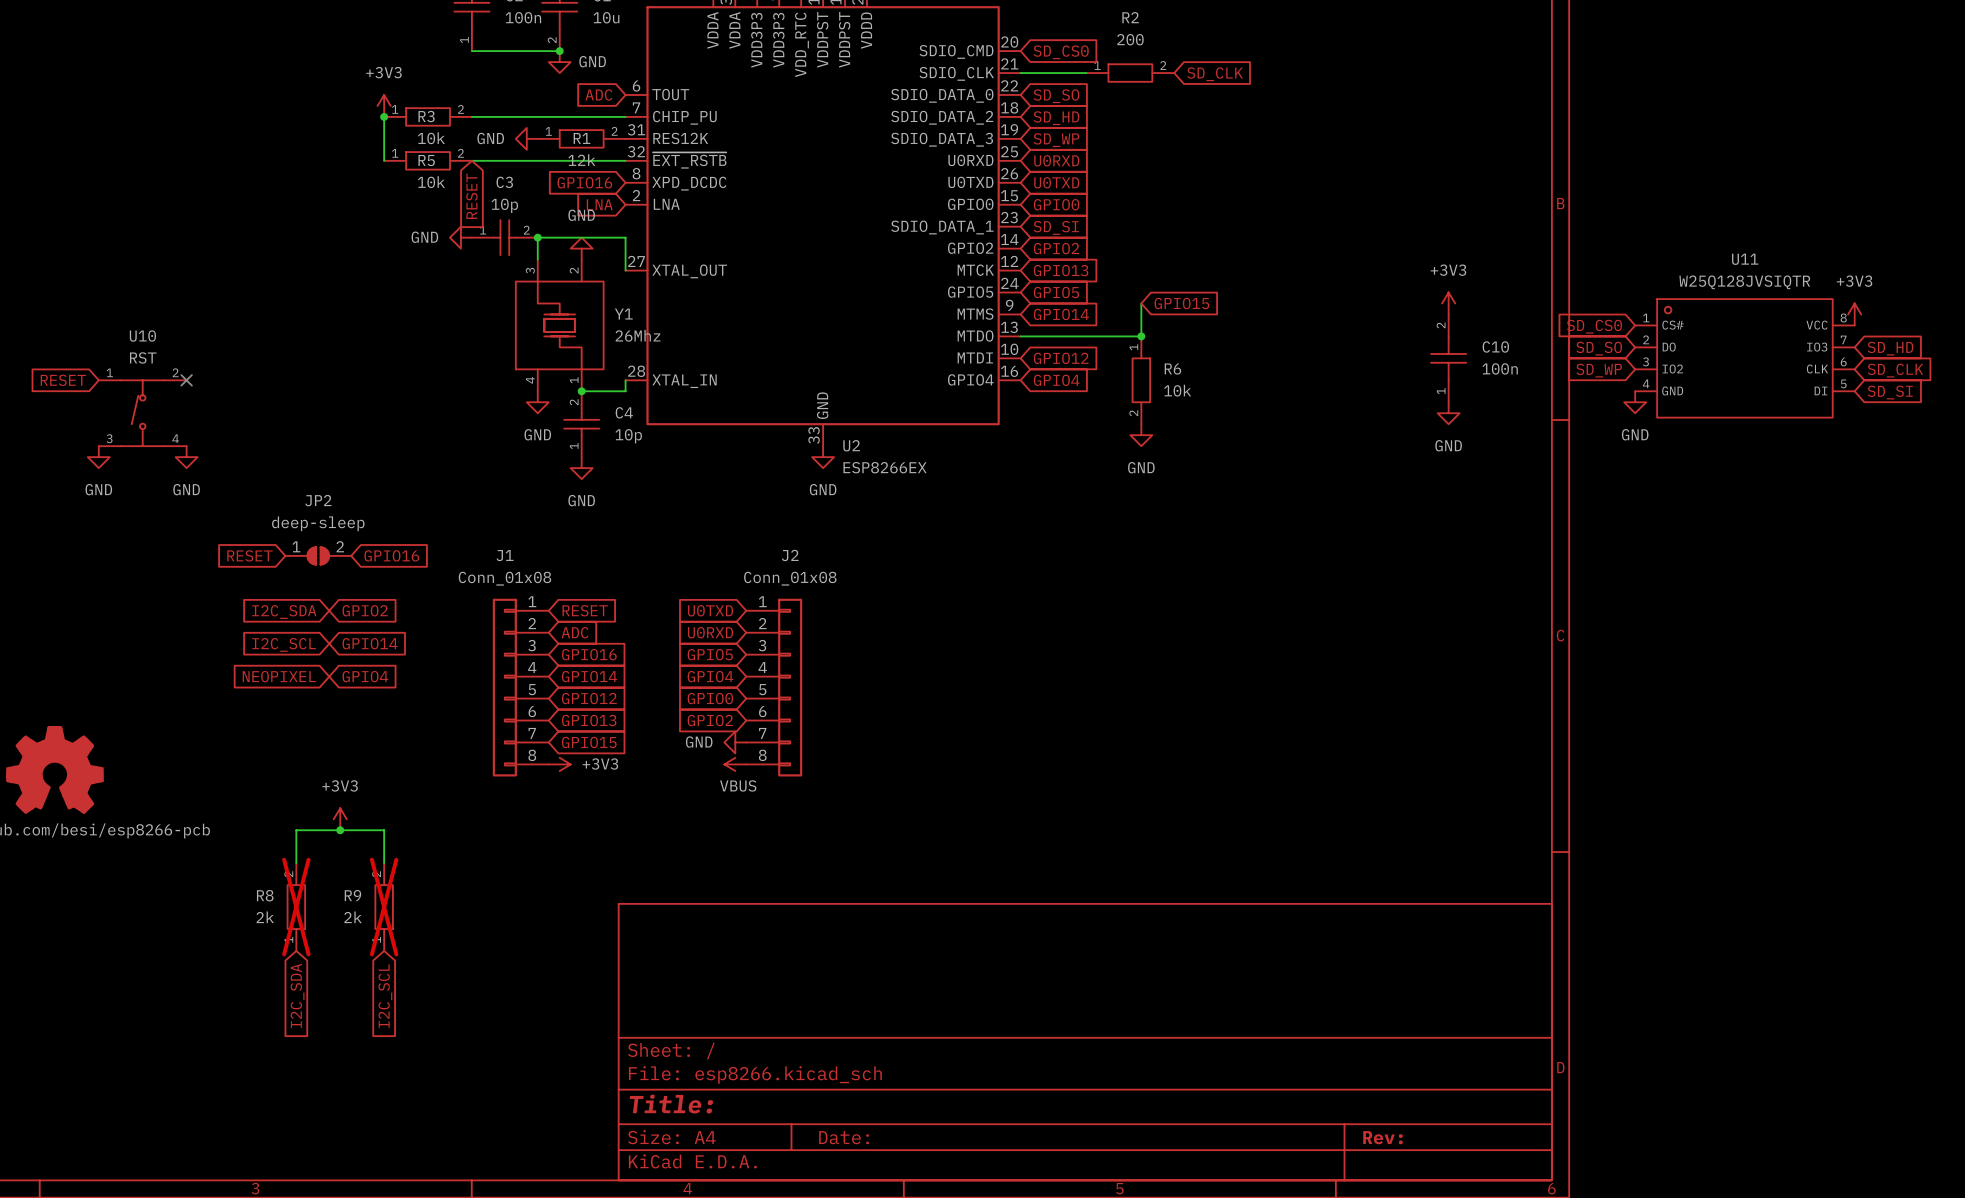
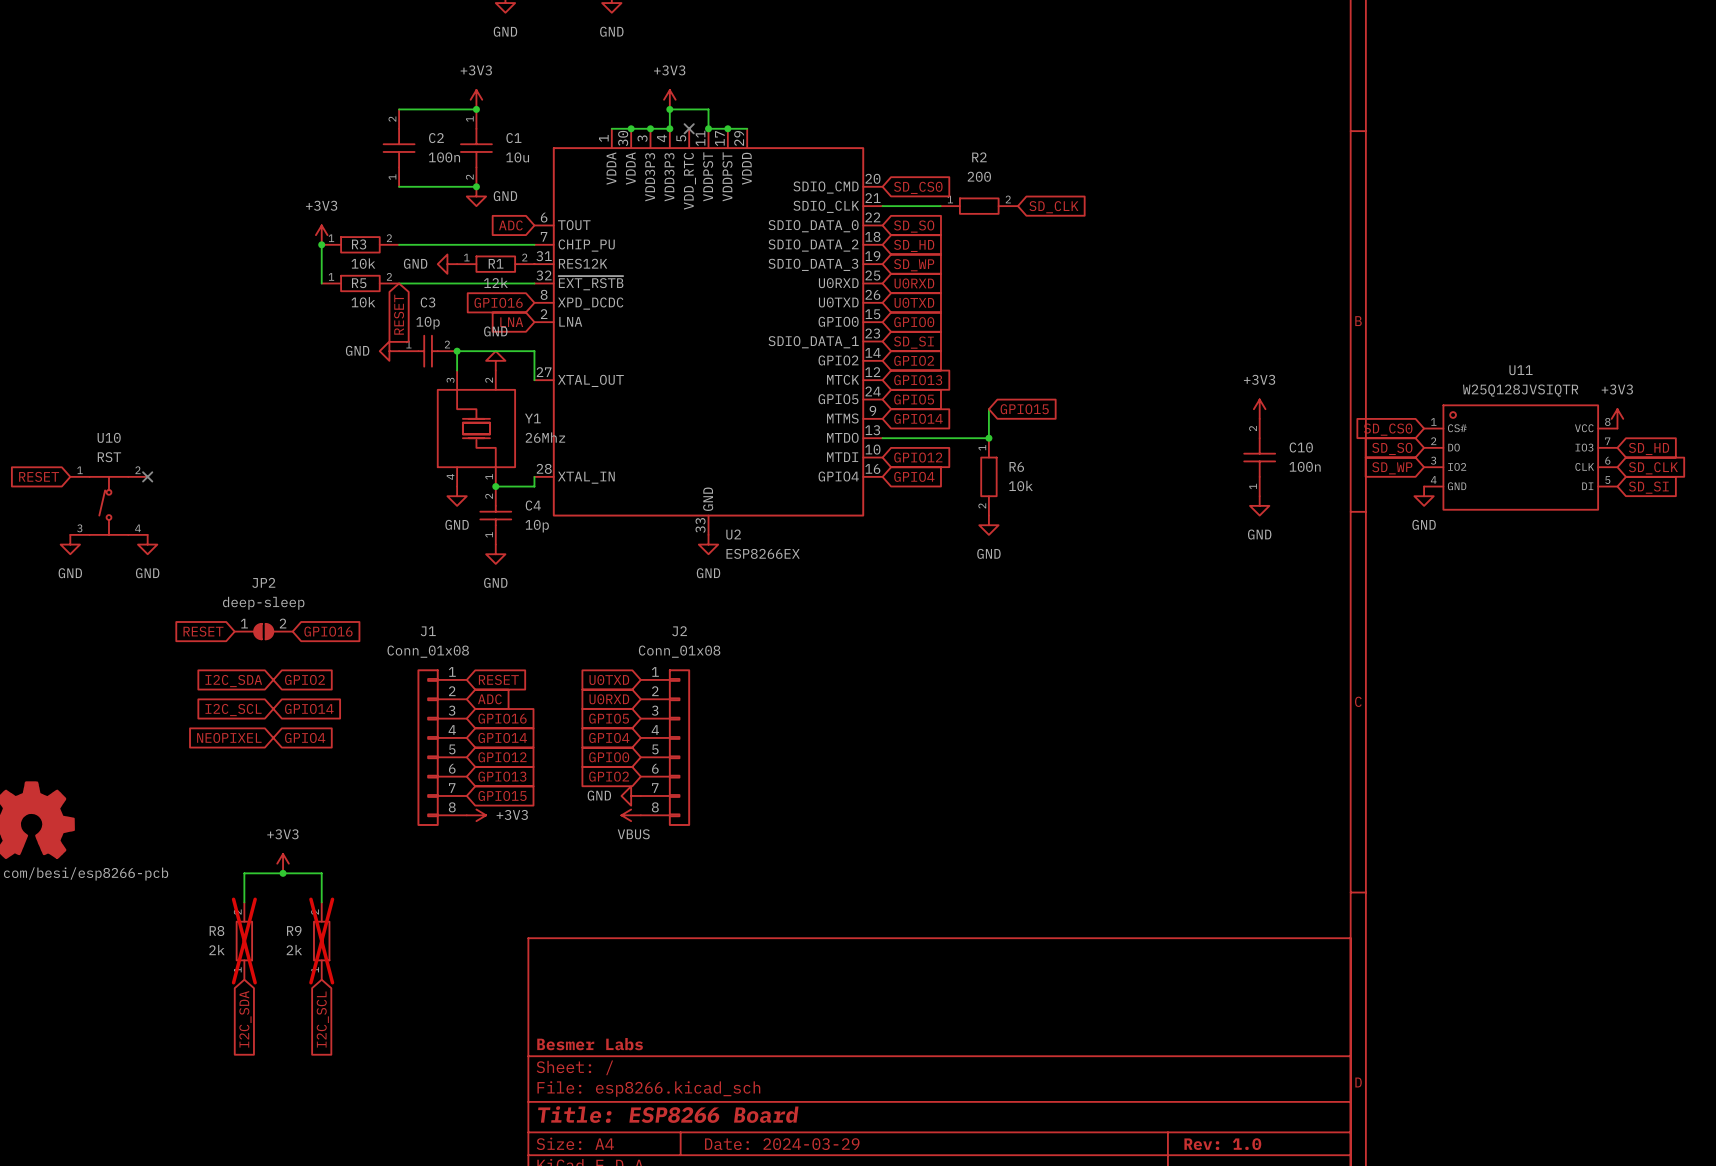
title block: none -> Besmer Labs (590, 1044)
title block: Title: (671, 1104) -> Title: ESP8266 Board (668, 1114)
title block: Date: (844, 1137) -> Date: 2024-03-29 (782, 1144)
title block: Rev: (1382, 1137) -> Rev: 1.0 (1222, 1144)

